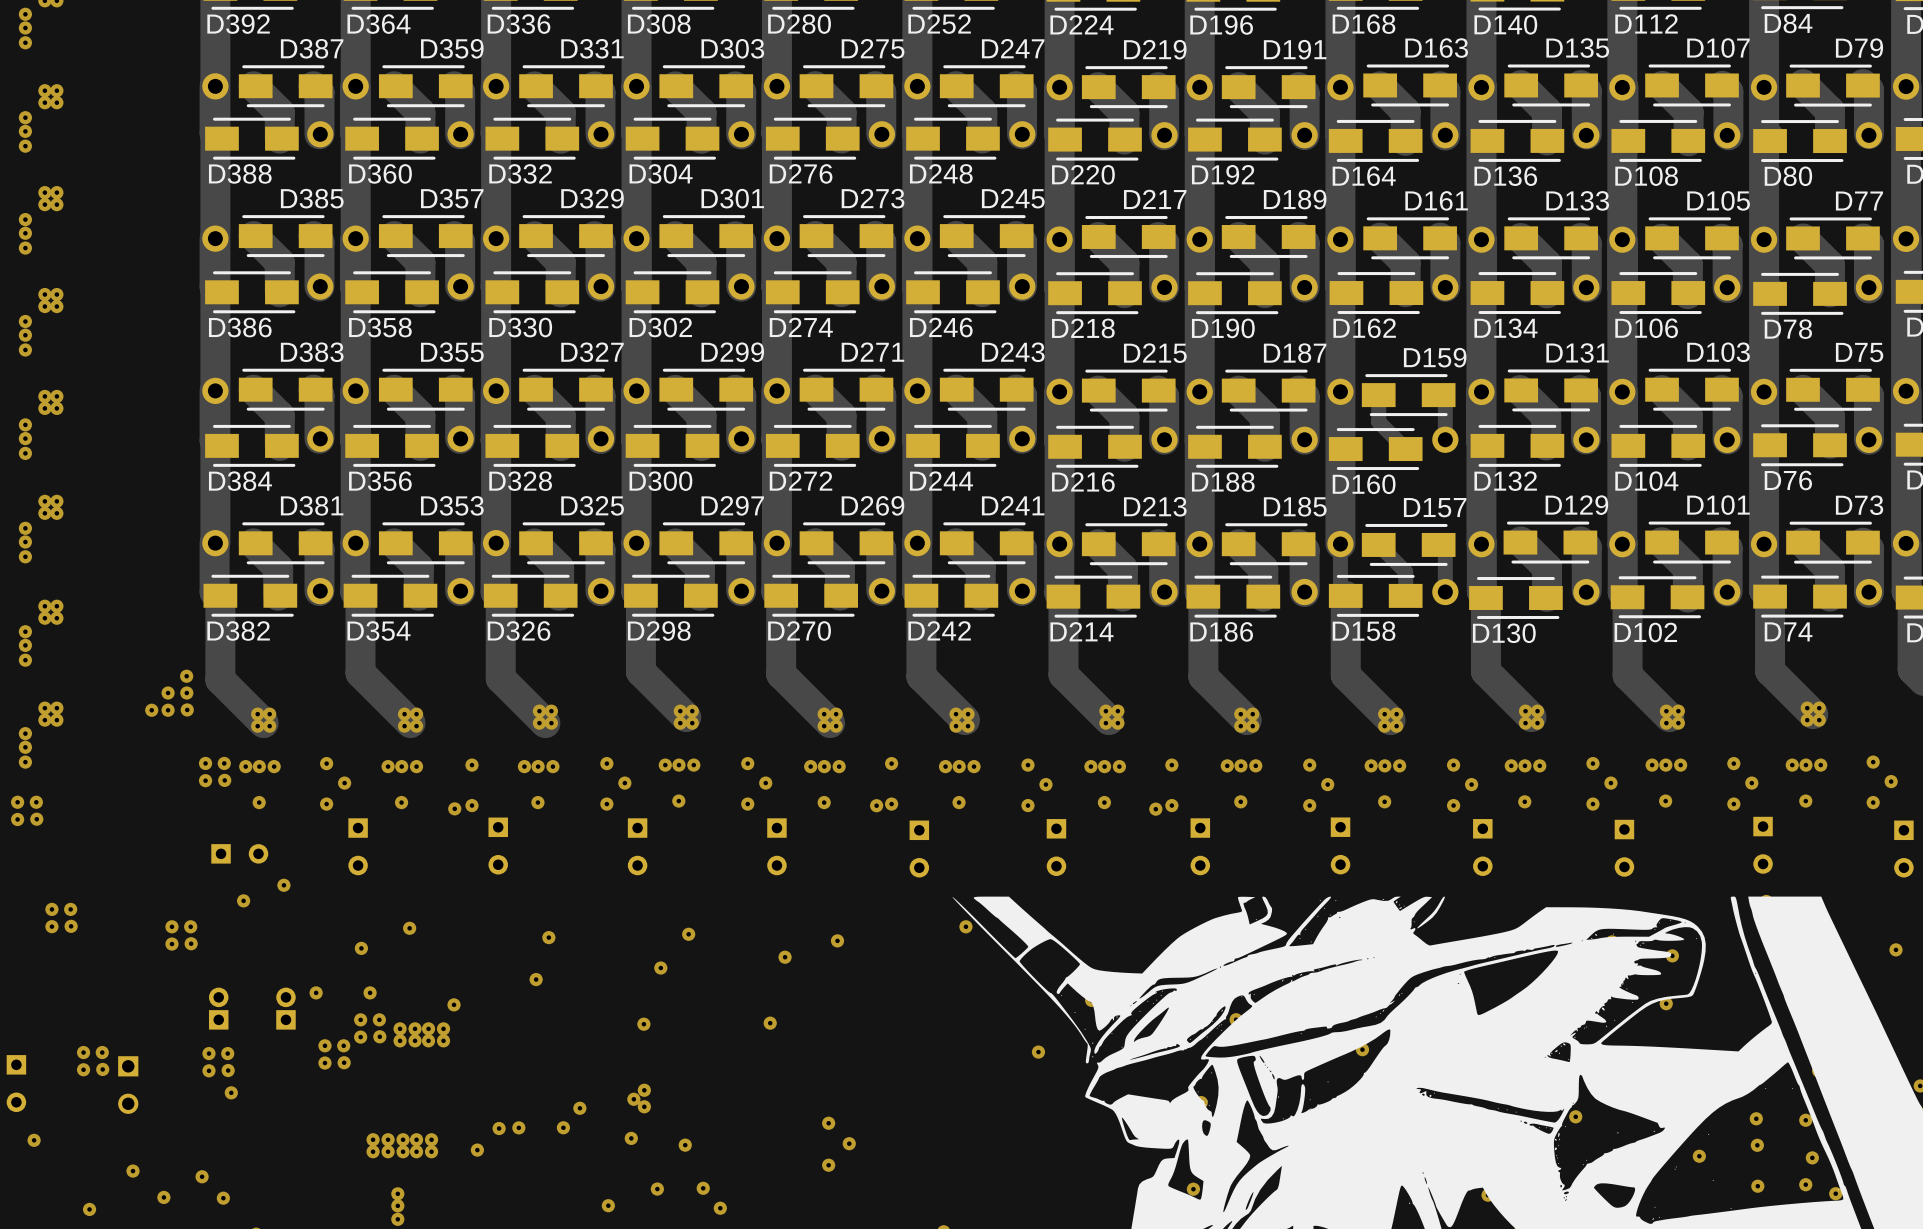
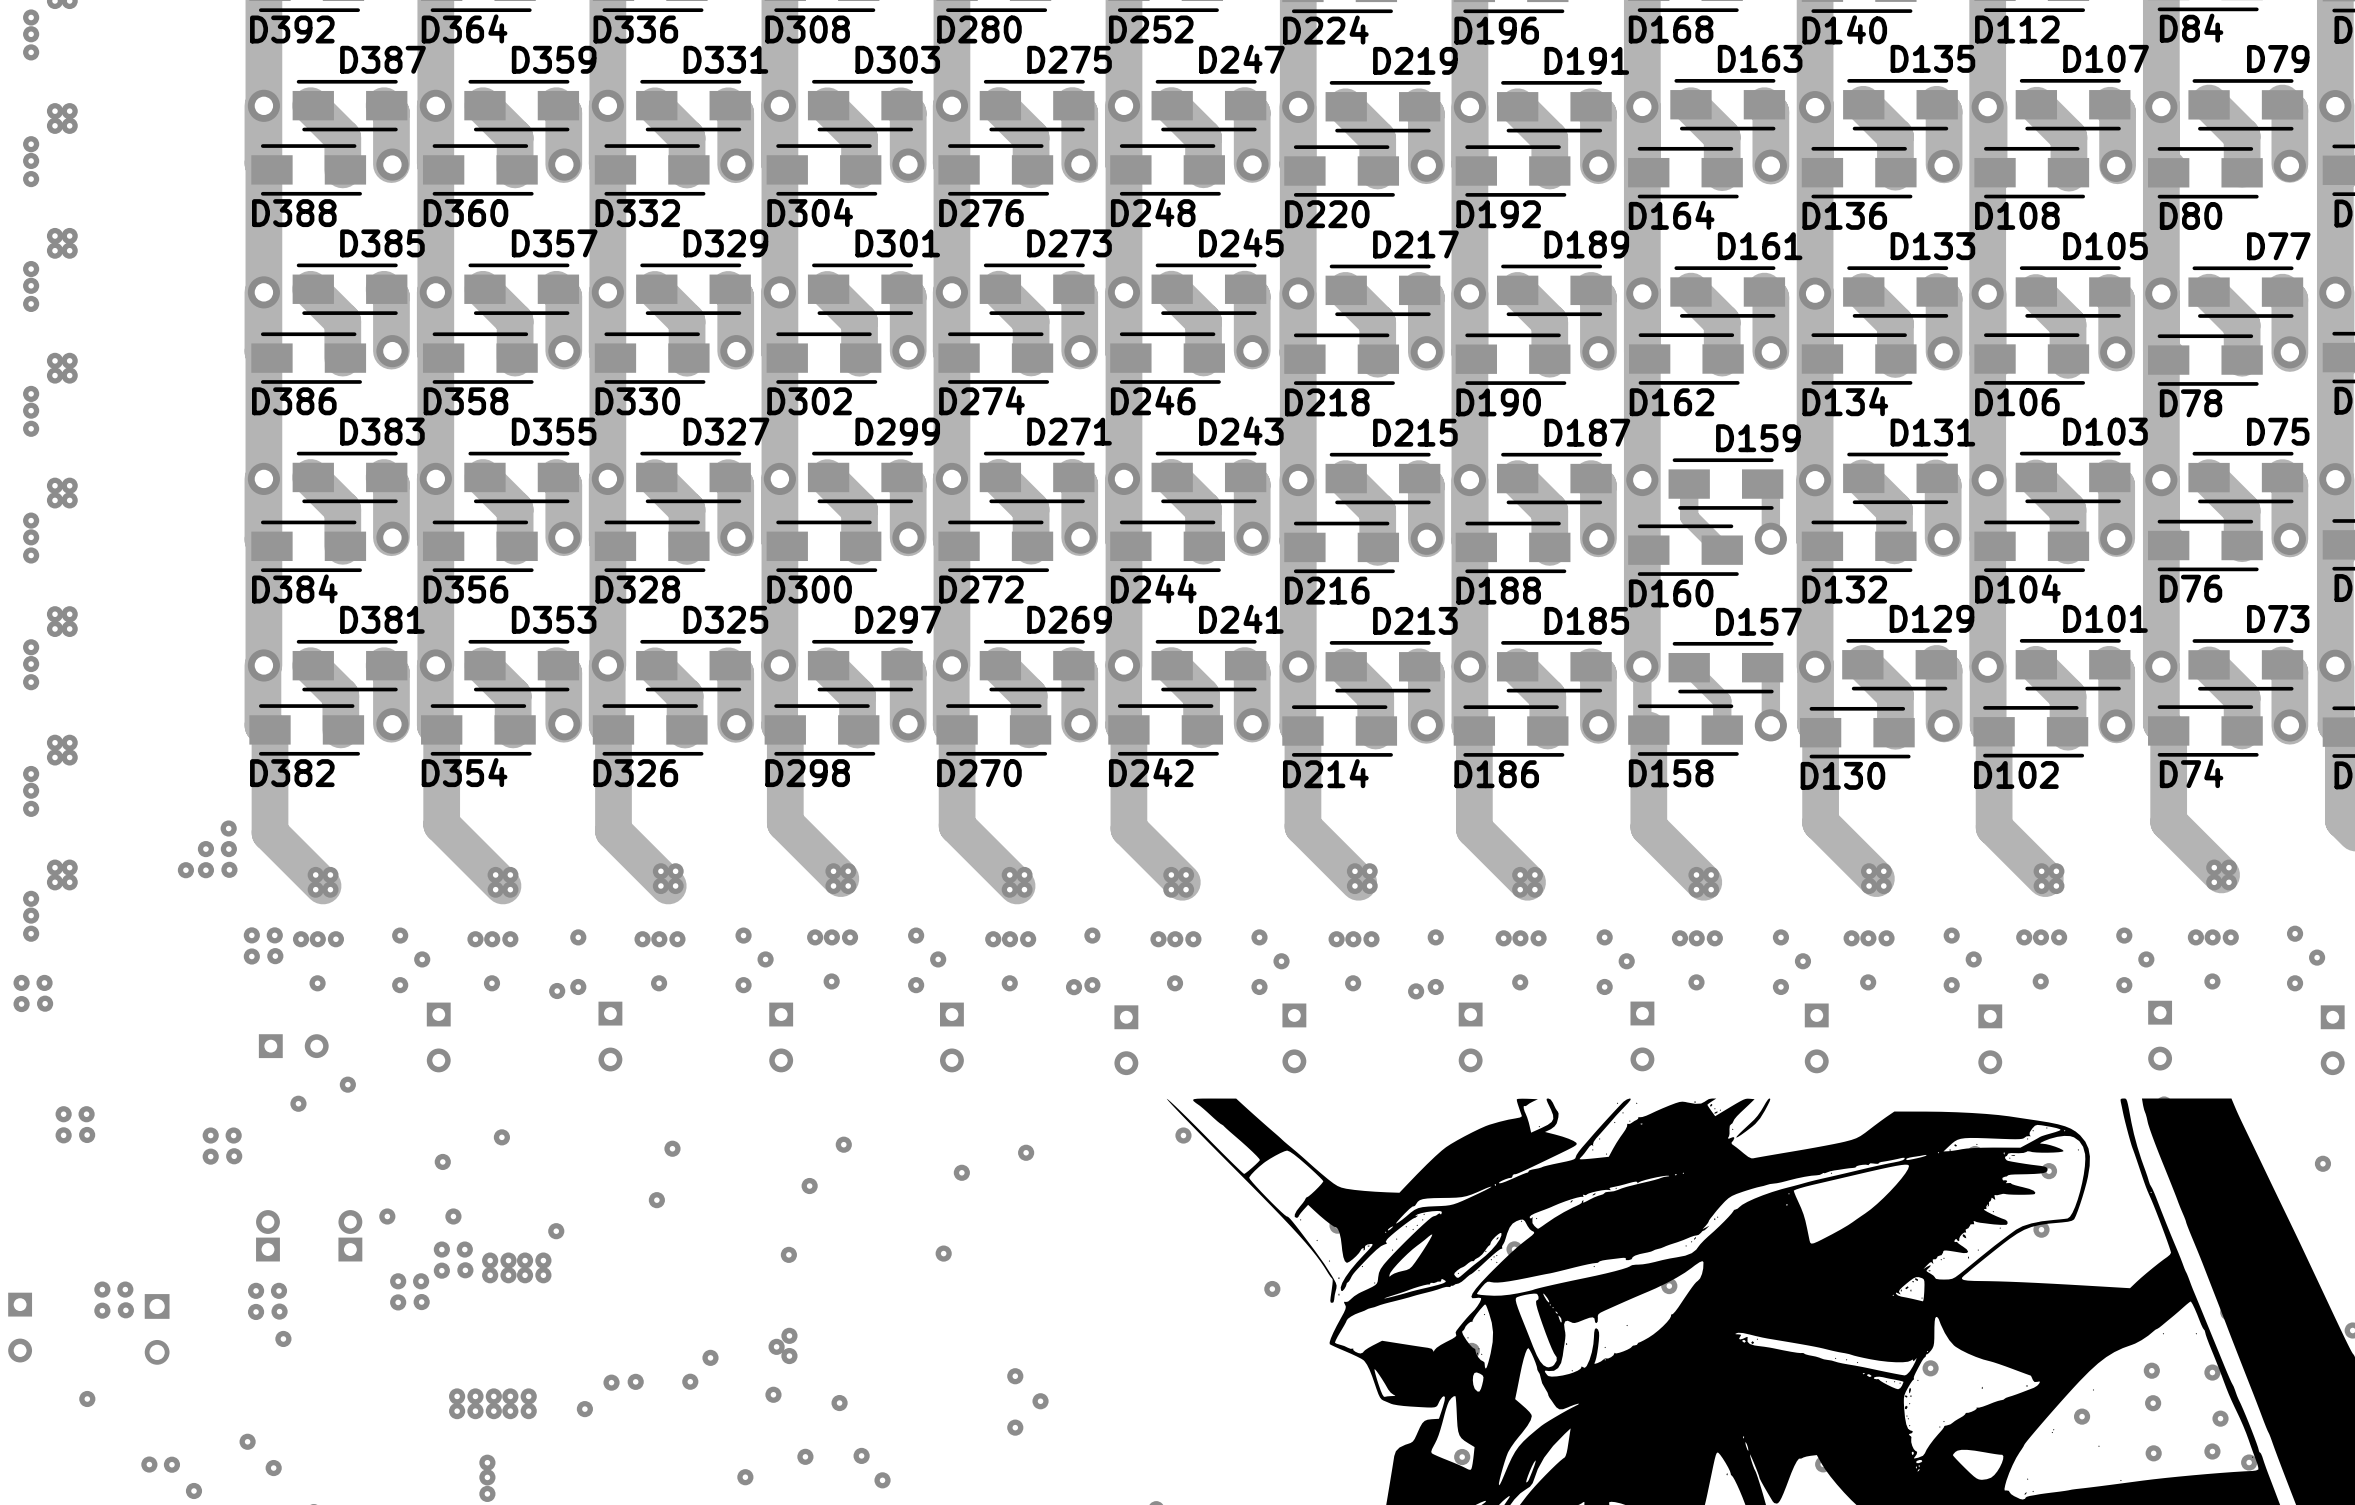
via: (34, 1140) -> none
via: none -> (87, 1399)
via: (133, 1171) -> none
via: none -> (149, 1464)
via: none -> (171, 1464)
via: (163, 1197) -> none
via: (89, 1209) -> none
via: none -> (193, 1490)

